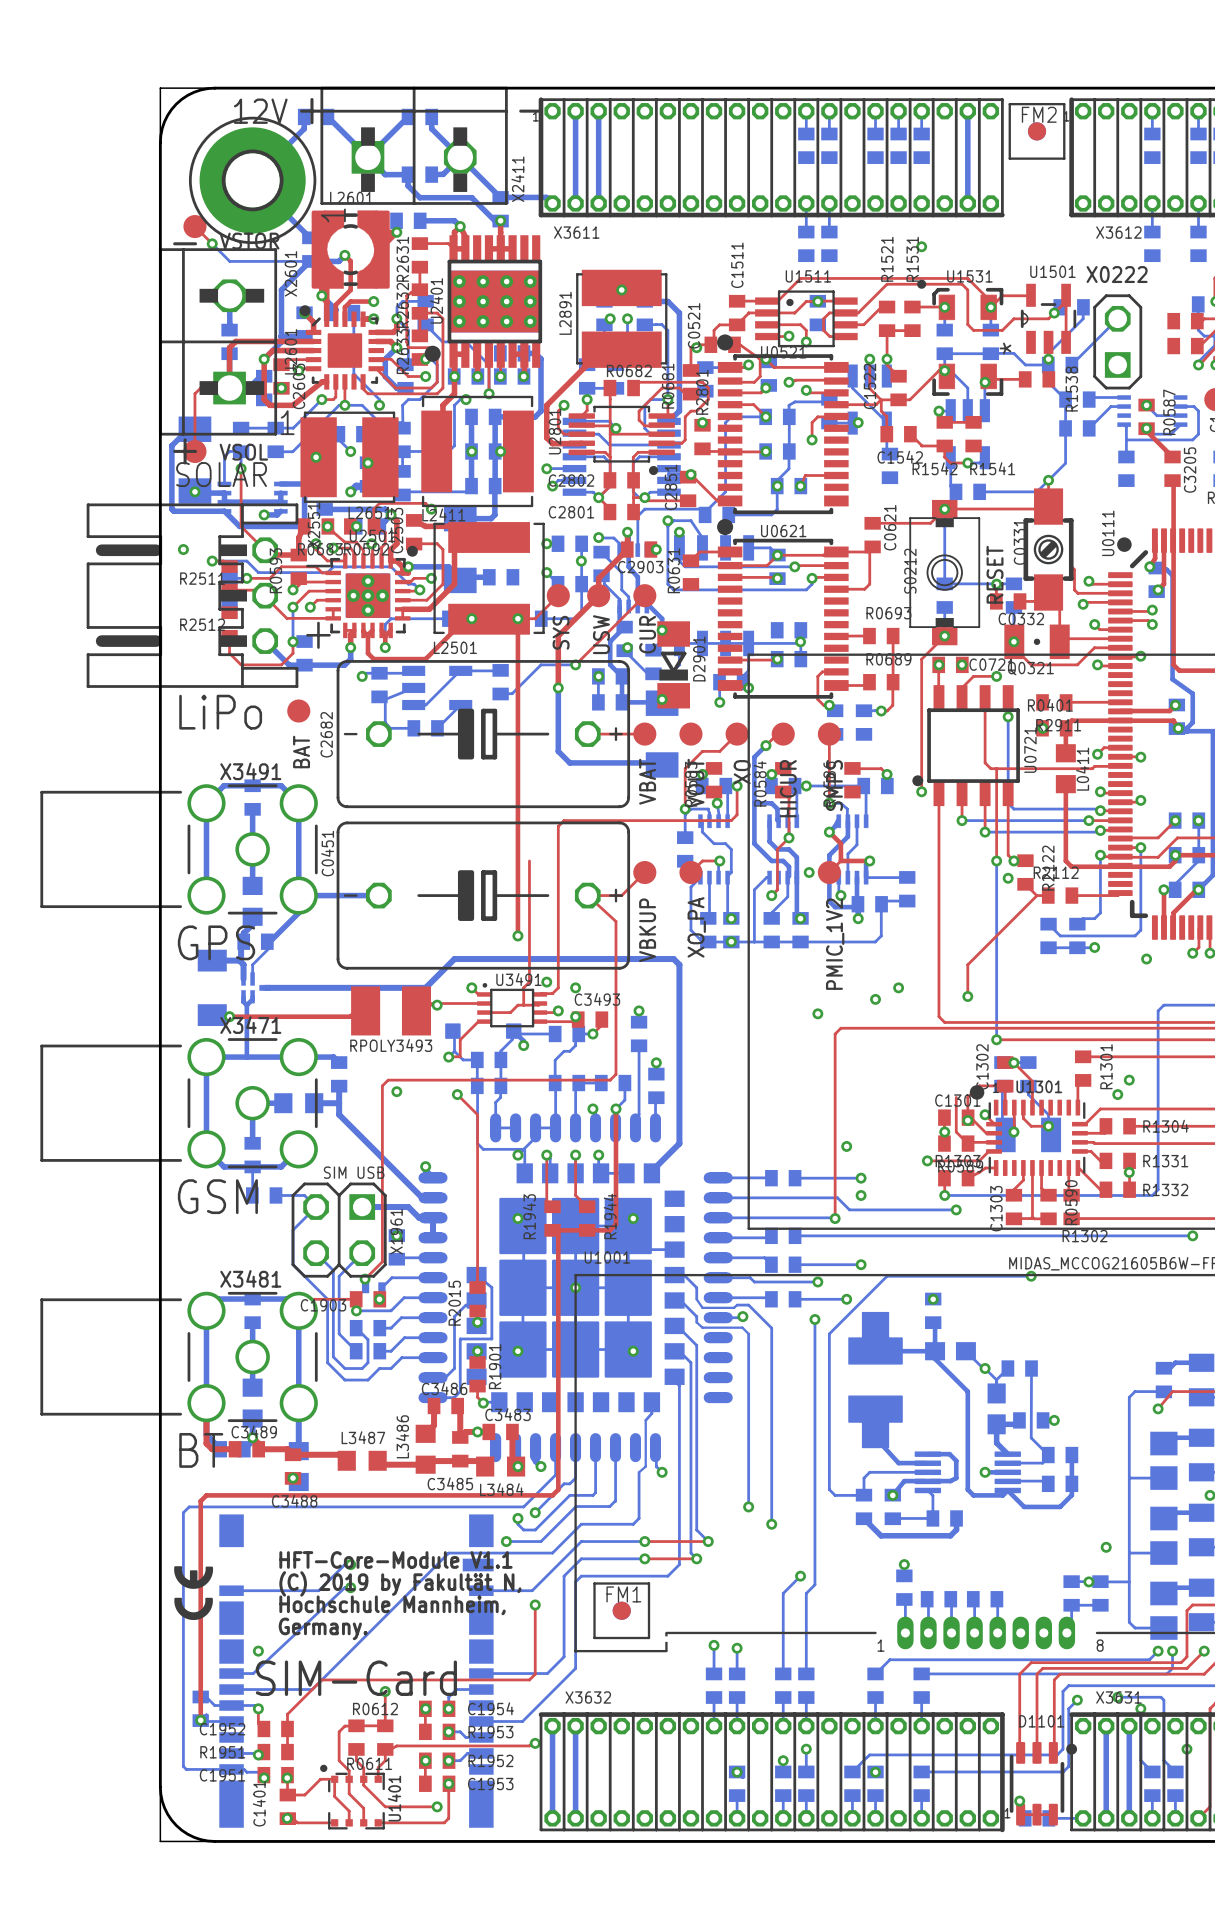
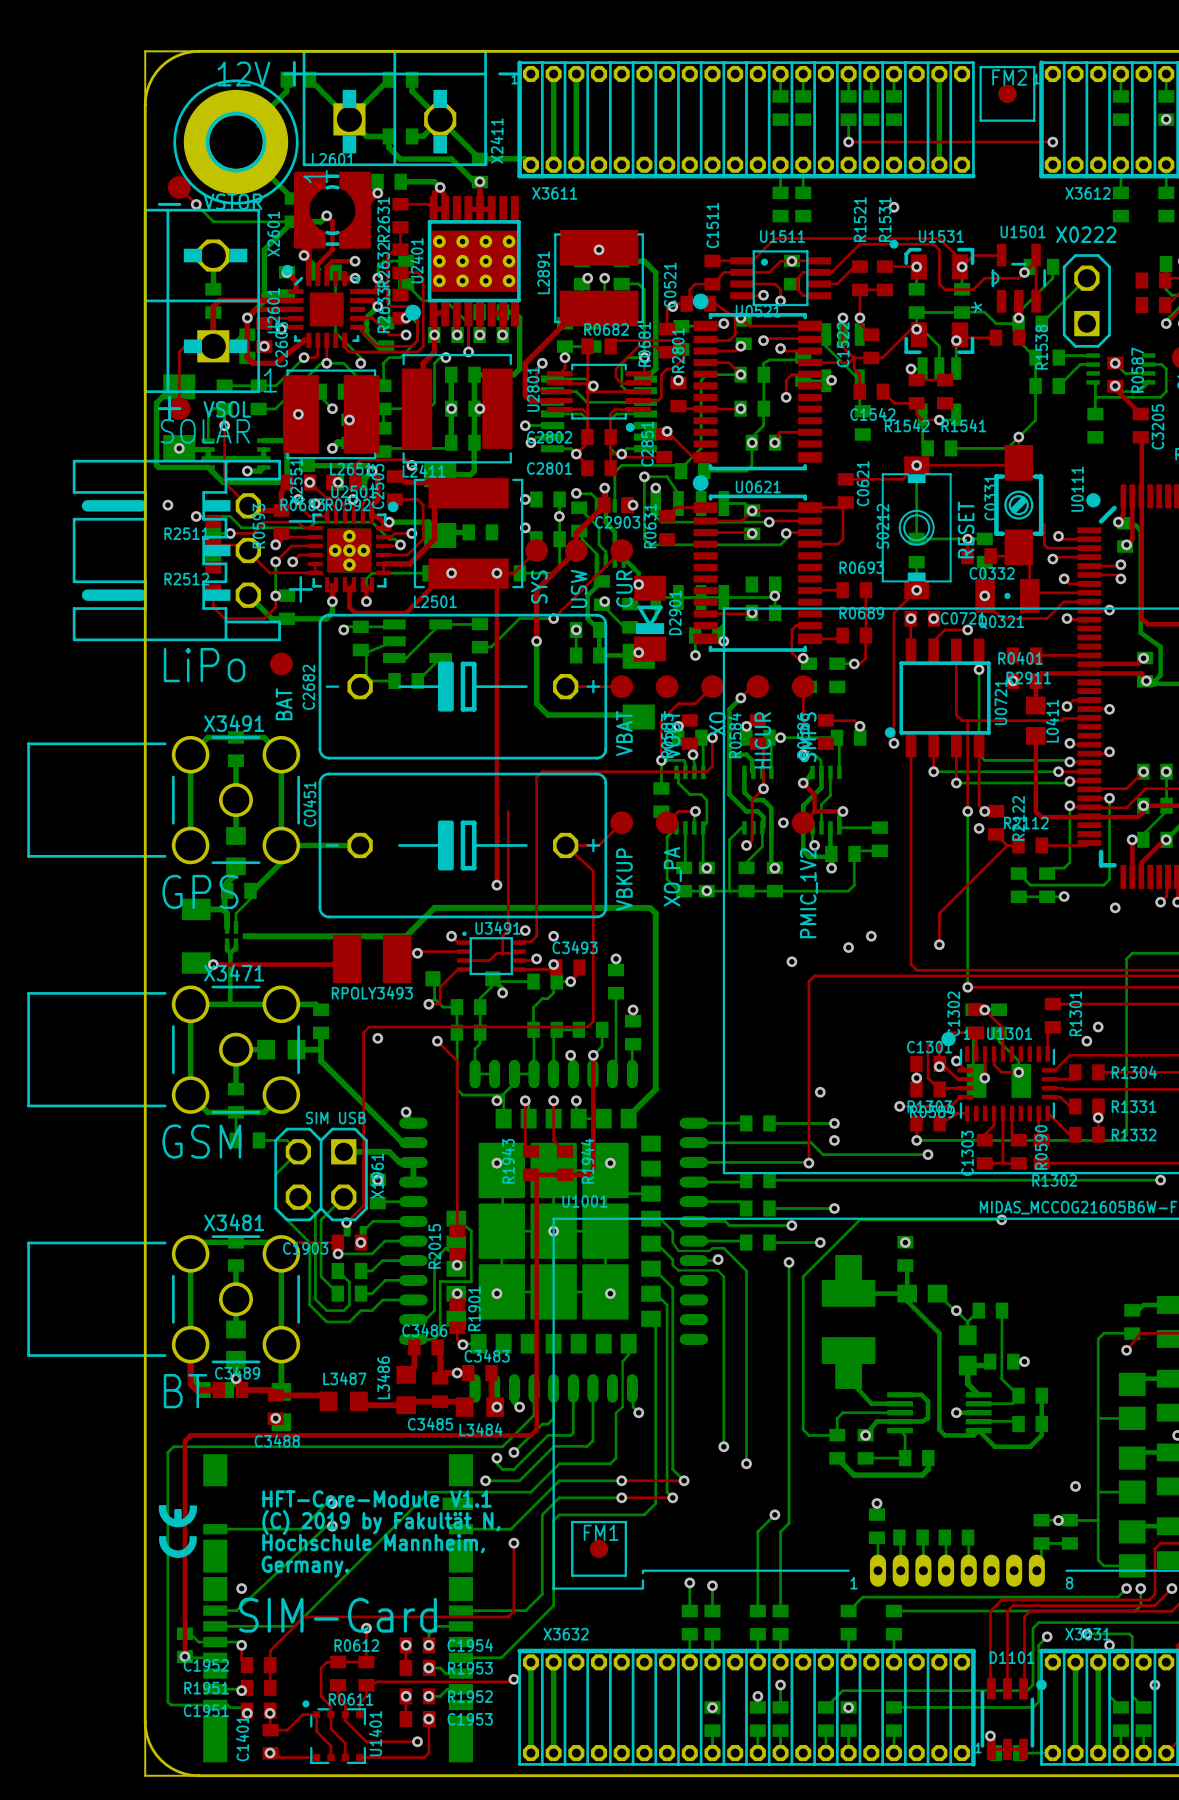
bottom track: none -> (848, 119) (848, 142)
via: none -> (1166, 119)
top track: none -> (848, 142) (1052, 142)
via: none -> (848, 142)
via: none -> (1052, 142)

